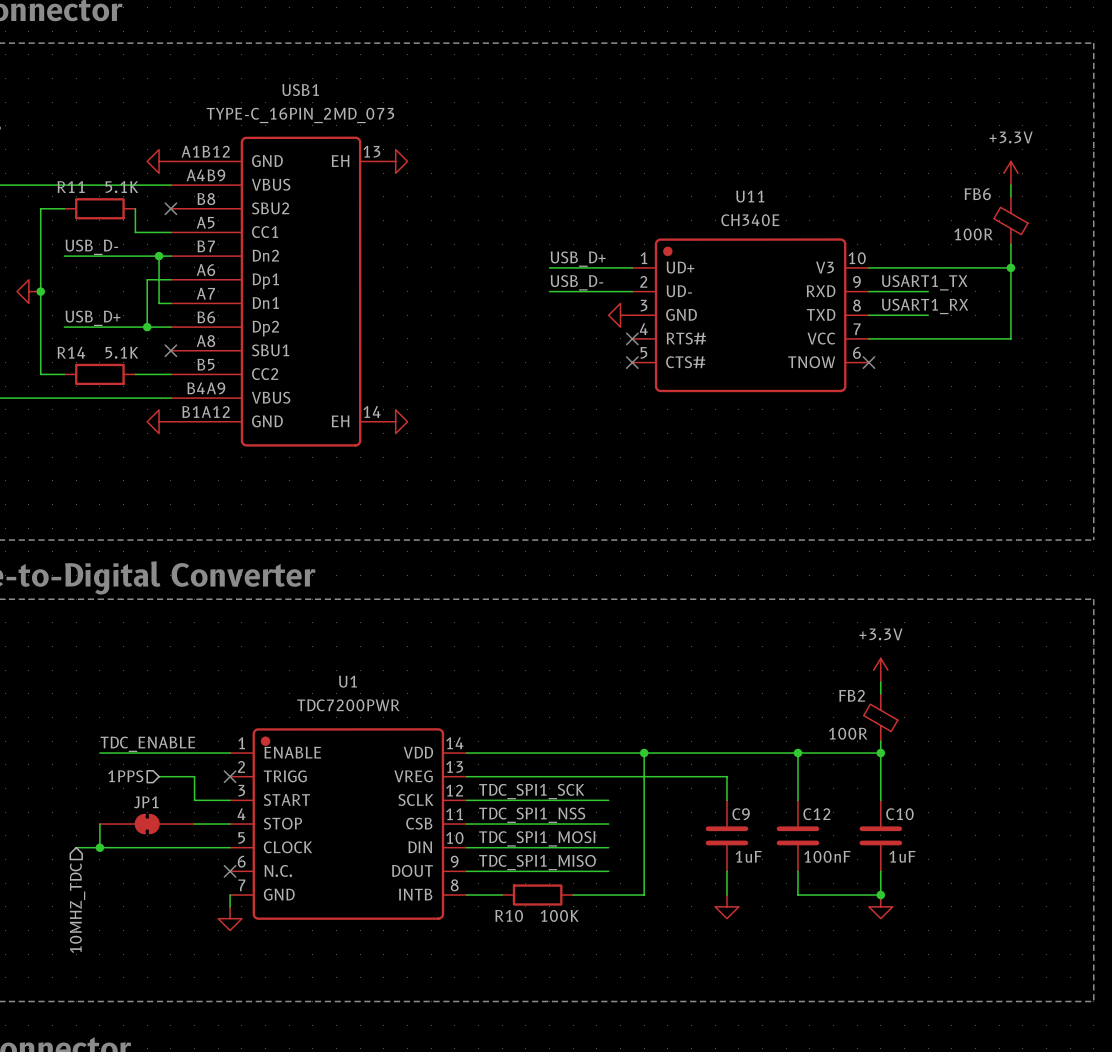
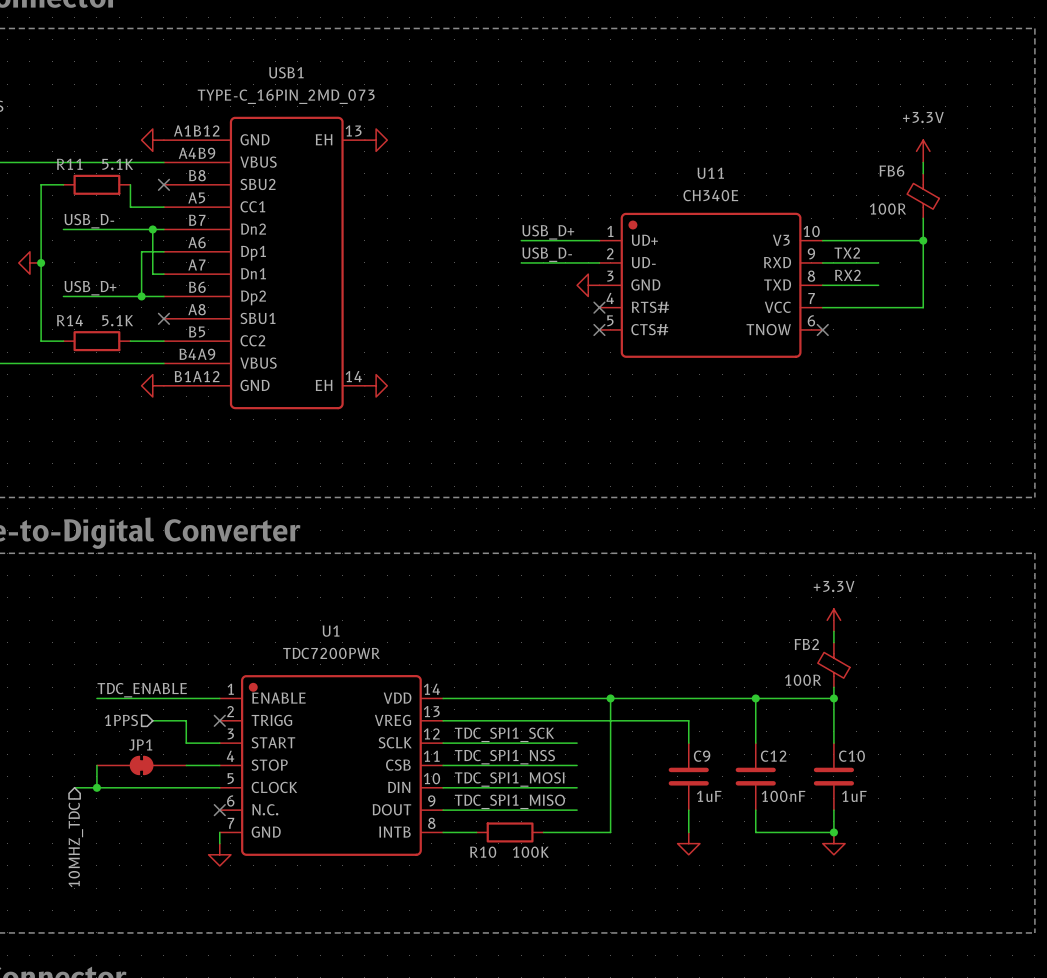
power symbol position: +3.3V (1010, 173) -> +3.3V (923, 151)
wire: (1010, 185) (1010, 196) -> (923, 162) (923, 173)
FB6 position: (1010, 220) -> (923, 195)
wire: (1010, 244) (1010, 338) (975, 338) -> (923, 218) (923, 307)
wire: (975, 267) (1010, 267) -> none
junction position: (1010, 267) -> (923, 240)
label: USART1_TX (924, 282) -> TX2 (847, 253)
label: USART1_RX (925, 306) -> RX2 (847, 275)

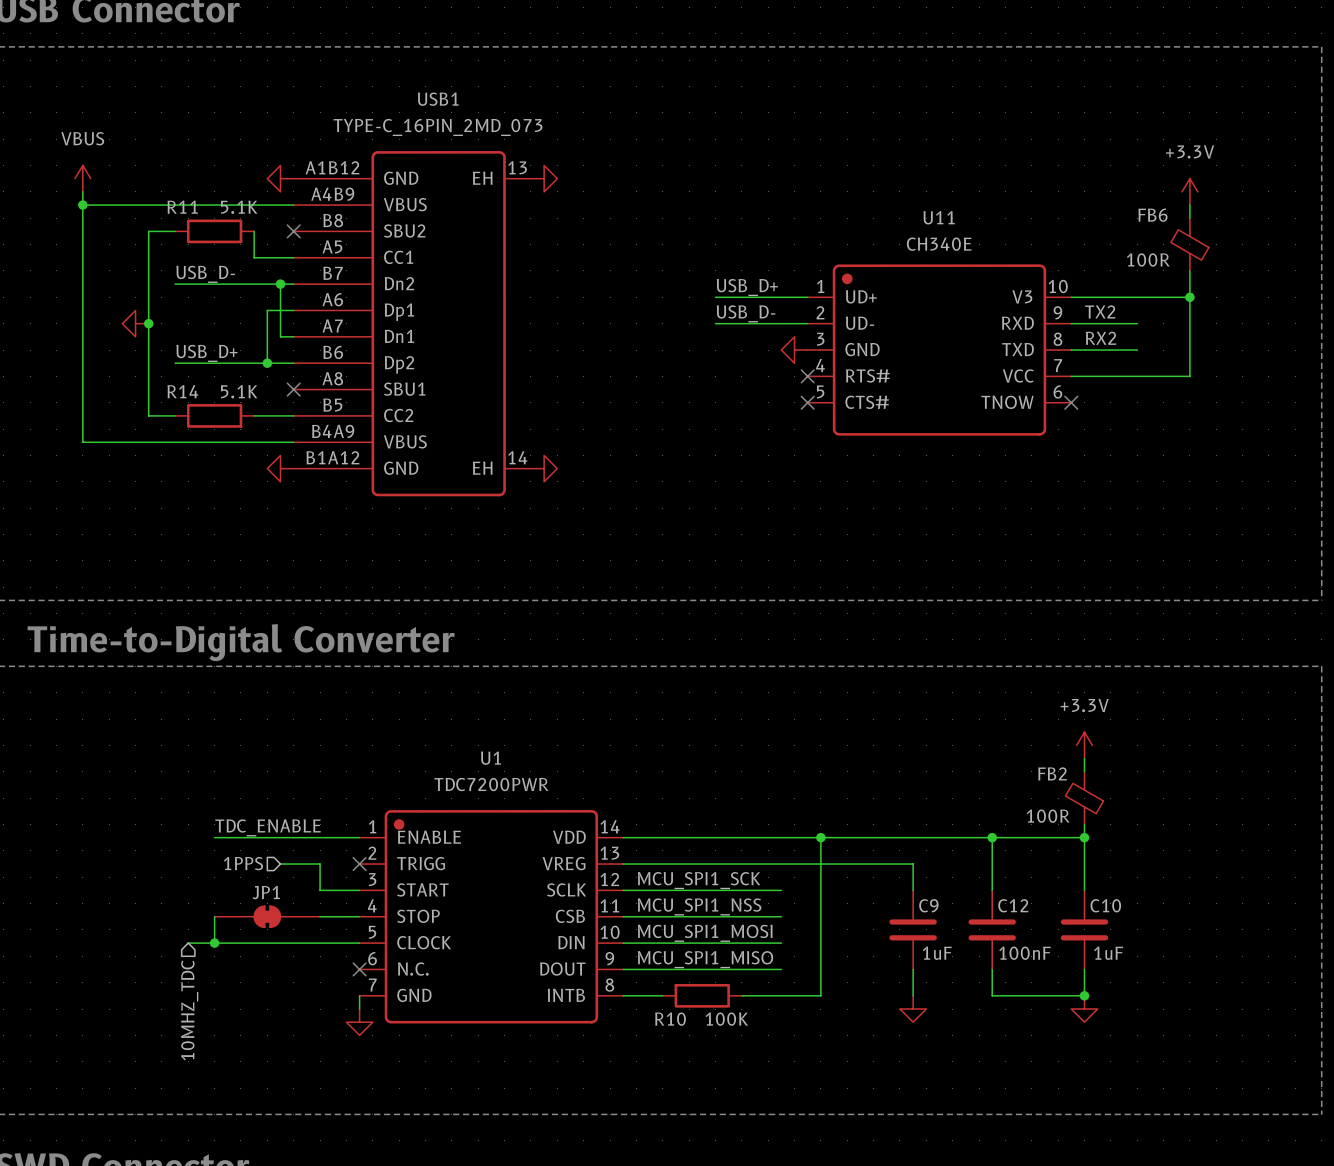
label: TDC_SPI1_SCK (504, 734) -> MCU_SPI1_SCK (699, 880)
label: TDC_SPI1_NSS (504, 757) -> MCU_SPI1_NSS (699, 906)
label: TDC_SPI1_MOSI (509, 779) -> MCU_SPI1_MOSI (705, 933)
label: TDC_SPI1_MISO (509, 801) -> MCU_SPI1_MISO (705, 959)

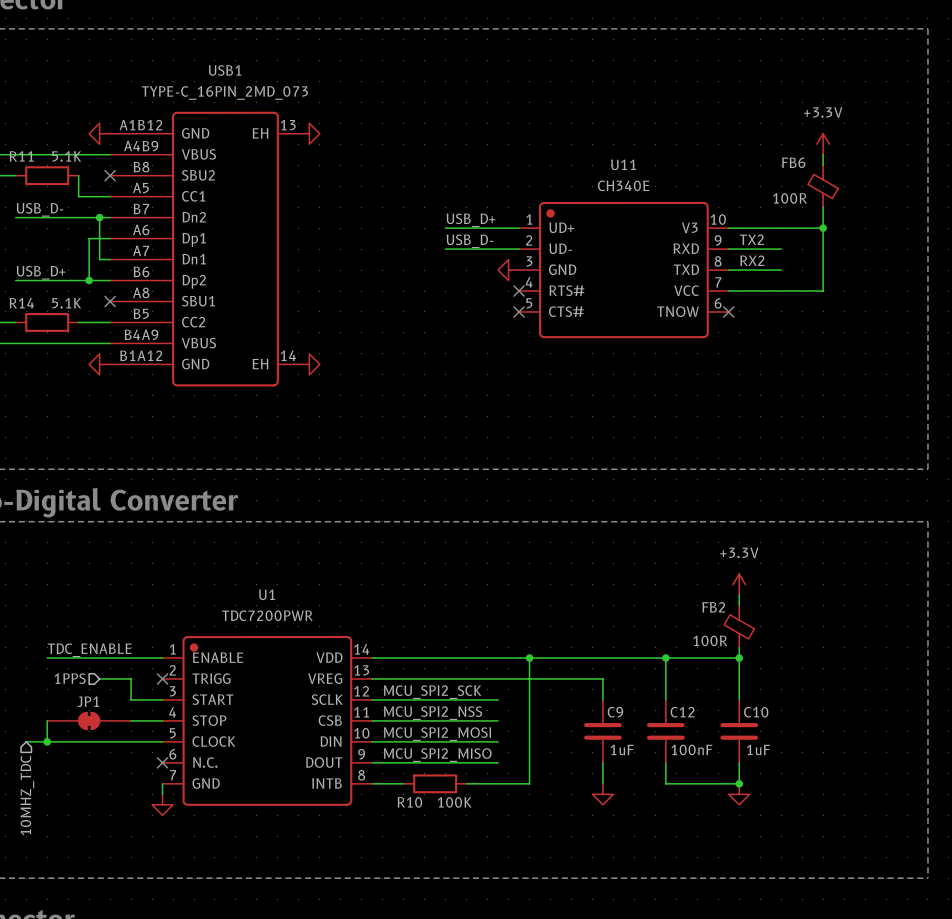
label: MCU_SPI1_SCK (699, 880) -> MCU_SPI2_SCK (432, 692)
label: MCU_SPI1_NSS (699, 906) -> MCU_SPI2_NSS (433, 713)
label: MCU_SPI1_MOSI (705, 933) -> MCU_SPI2_MOSI (437, 734)
label: MCU_SPI1_MISO (705, 959) -> MCU_SPI2_MISO (437, 755)

